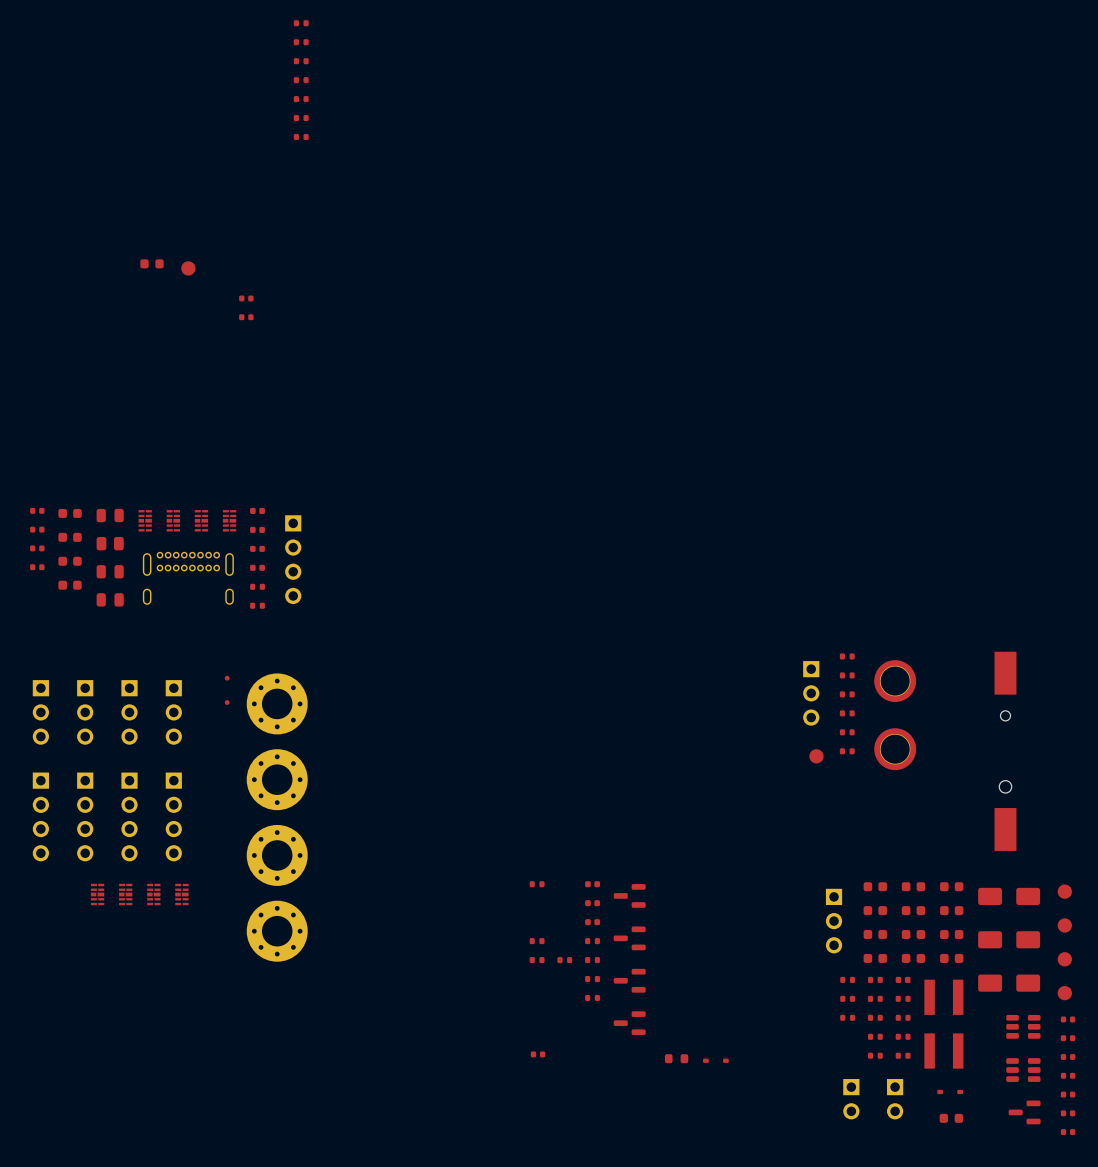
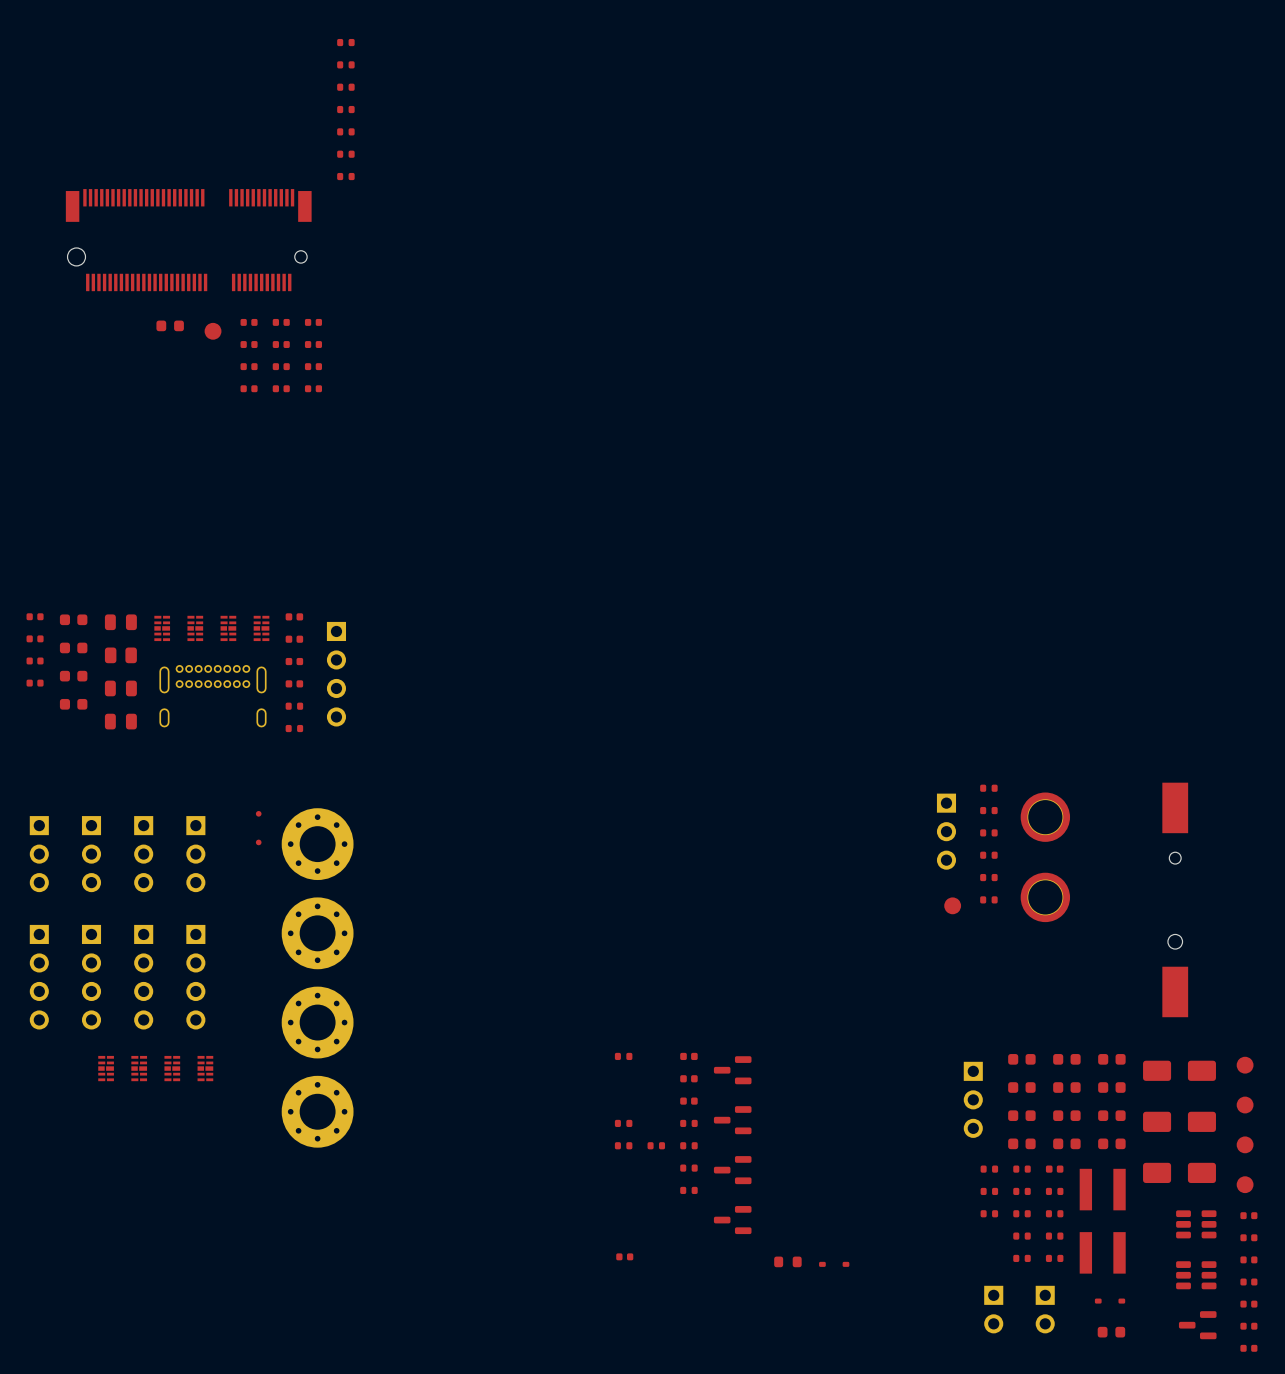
part: none -> (188, 240)
part: none -> (249, 322)
part: none -> (281, 322)
part: none -> (313, 322)
part: none -> (249, 344)
part: none -> (281, 344)
part: none -> (313, 344)
part: none -> (249, 366)
part: none -> (313, 366)
part: none -> (249, 388)
part: none -> (313, 388)

